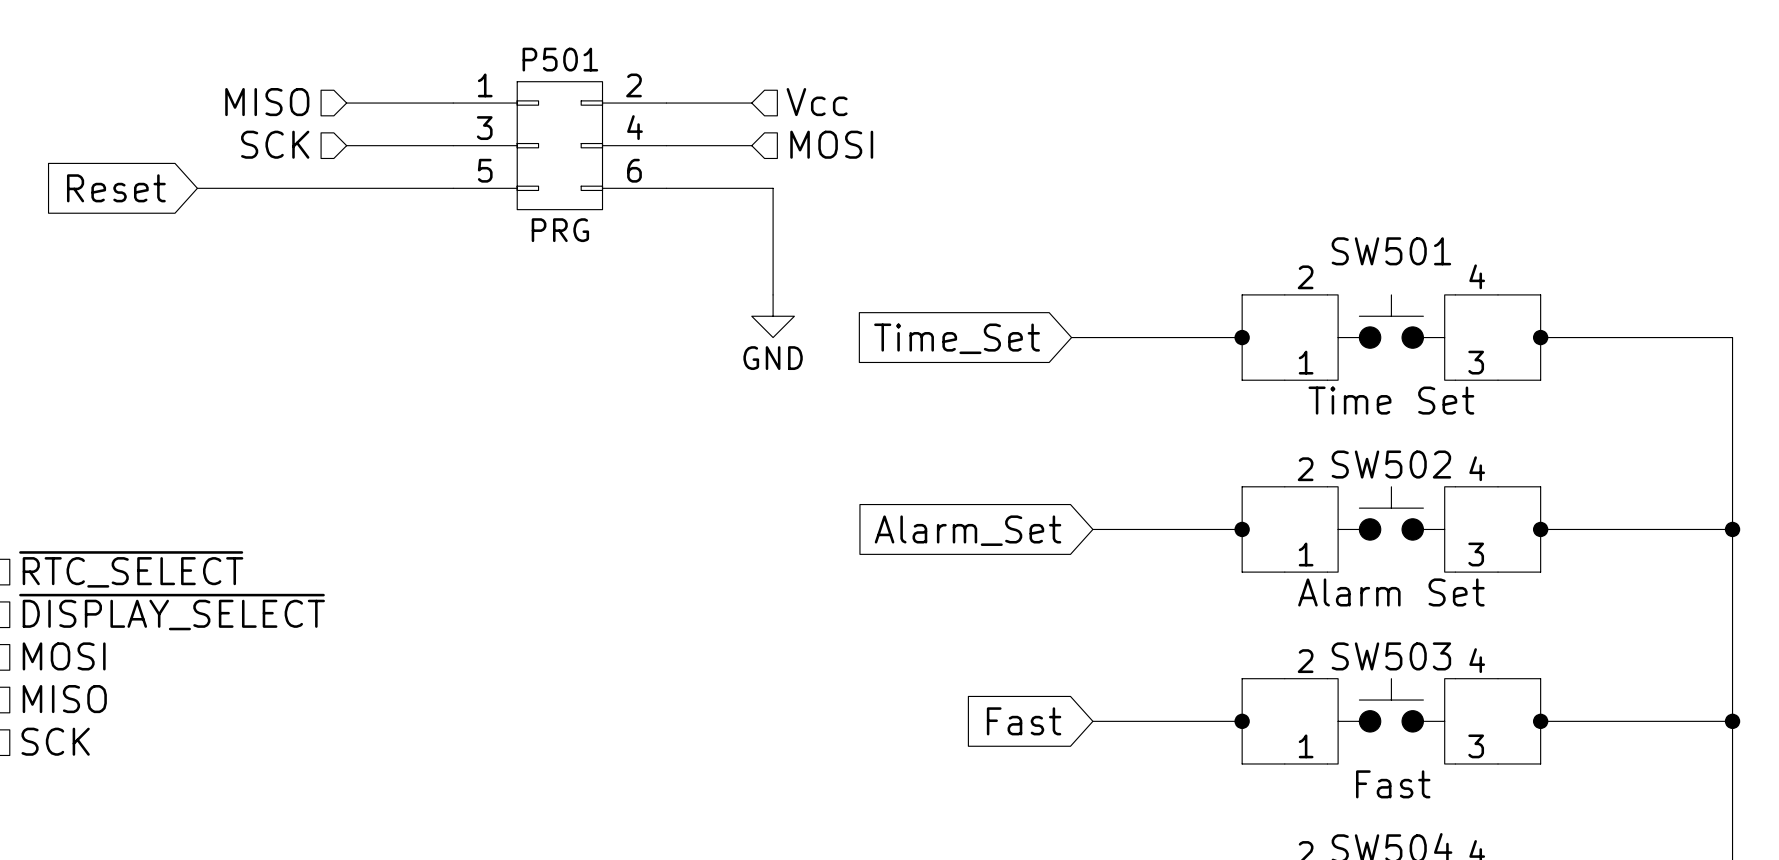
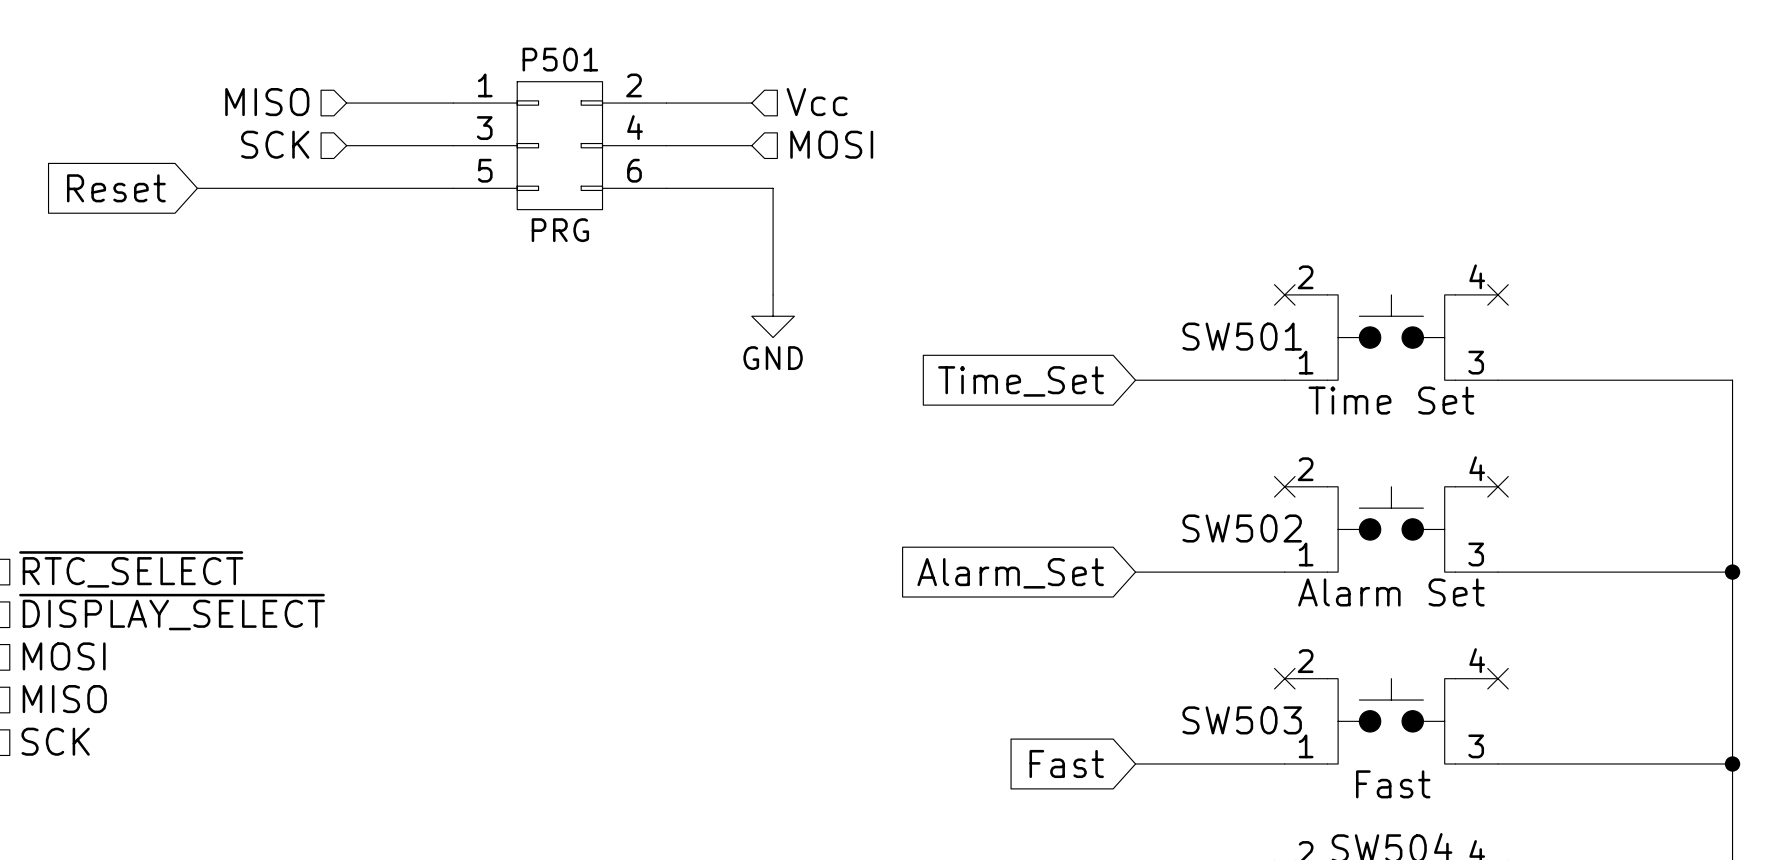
SW501 name position: SW501 (1391, 251) -> SW501 (1242, 336)
wire: (1284, 294) (1242, 294) (1242, 380) -> (1135, 380) (1242, 380)
no-connect mark: none -> (1284, 294)
wire: (1498, 294) (1540, 294) (1540, 380) -> none
no-connect mark: none -> (1498, 294)
wire: (1071, 337) (1242, 337) -> none
junction: (1242, 337) -> none
wire: (1540, 337) (1732, 337) (1732, 380) -> (1540, 380) (1732, 380)
junction: (1540, 337) -> none
global label position: Time_Set (957, 338) -> Time_Set (1021, 381)
SW502 name position: SW502 (1391, 464) -> SW502 (1242, 528)
wire: (1284, 486) (1242, 486) (1242, 572) -> (1135, 572) (1242, 572)
no-connect mark: none -> (1284, 486)
wire: (1498, 486) (1540, 486) (1540, 572) -> (1732, 572) (1540, 572)
no-connect mark: none -> (1498, 486)
wire: (1092, 529) (1242, 529) -> none
junction: (1242, 529) -> none
wire: (1540, 529) (1732, 529) -> none
junction: (1540, 529) -> none
junction position: (1732, 529) -> (1732, 572)
global label position: Alarm_Set (968, 530) -> Alarm_Set (1010, 573)
SW503 name position: SW503 (1391, 656) -> SW503 (1242, 720)
wire: (1284, 678) (1242, 678) (1242, 763) -> (1135, 763) (1242, 763)
no-connect mark: none -> (1284, 678)
wire: (1498, 678) (1540, 678) (1540, 763) -> (1732, 763) (1540, 763)
no-connect mark: none -> (1498, 678)
global label position: Fast (1024, 721) -> Fast (1066, 763)
wire: (1092, 721) (1242, 721) -> none
junction: (1242, 721) -> none
wire: (1540, 721) (1732, 721) -> none
junction: (1540, 721) -> none
junction position: (1732, 721) -> (1732, 763)

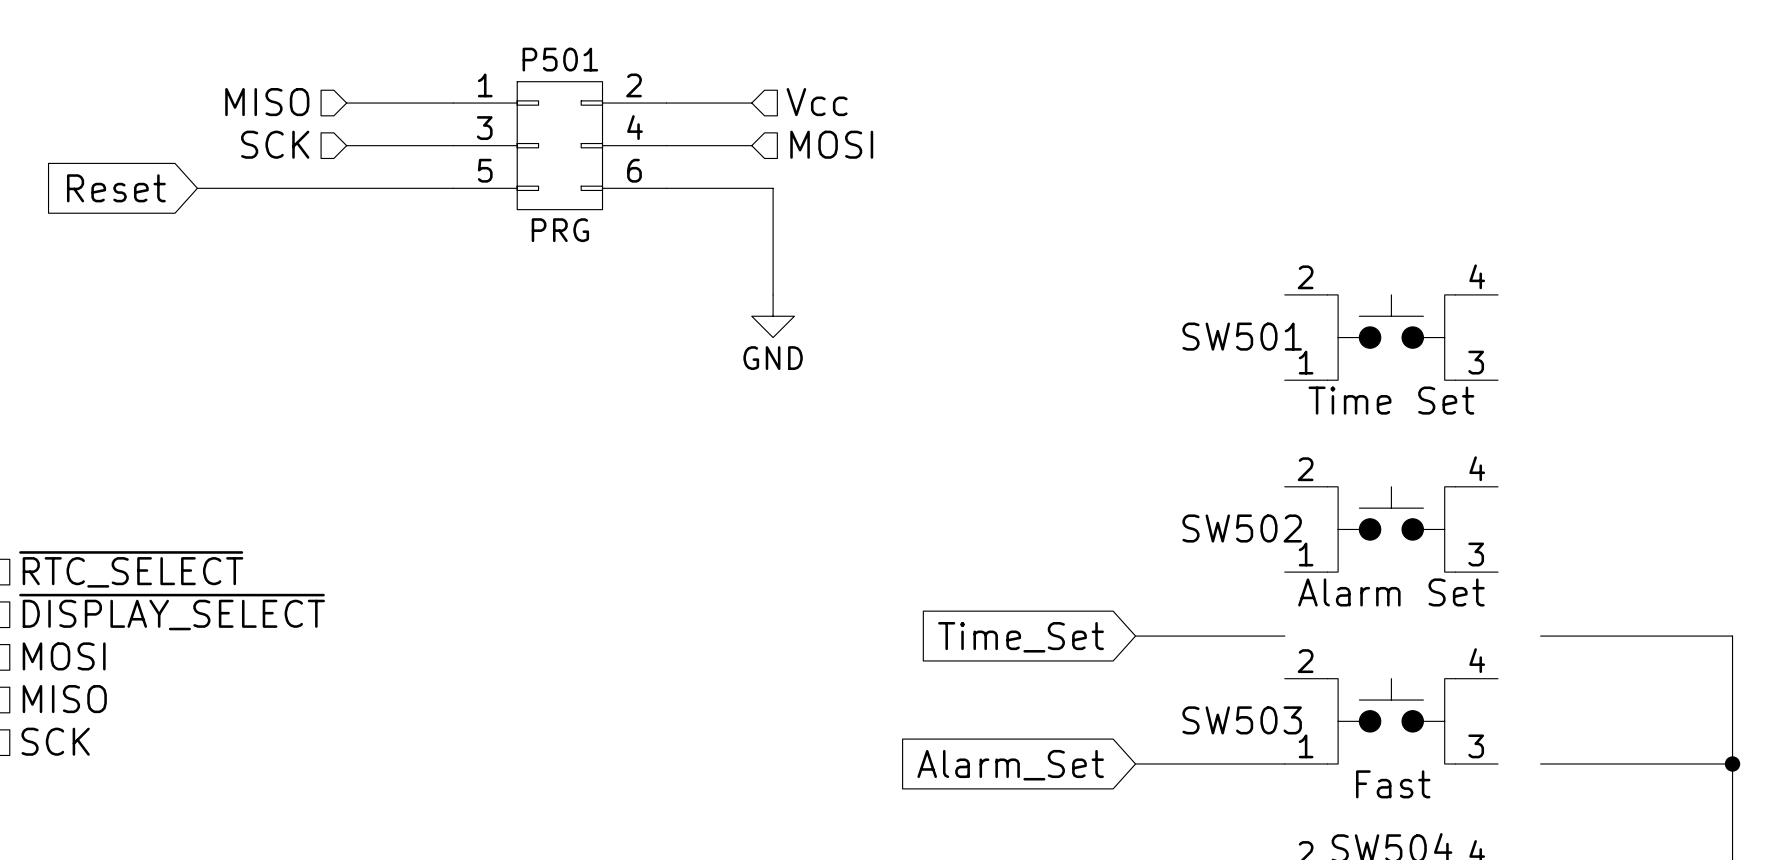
no-connect mark: (1284, 294) -> none
no-connect mark: (1498, 294) -> none
wire: (1135, 380) (1284, 380) -> none
wire: (1498, 380) (1732, 380) (1732, 636) -> (1540, 636) (1732, 636)
global label position: Time_Set (1021, 381) -> Time_Set (1021, 637)
no-connect mark: (1284, 486) -> none
no-connect mark: (1498, 486) -> none
wire: (1135, 572) (1284, 572) -> (1135, 636) (1284, 636)
wire: (1498, 572) (1732, 572) -> none
junction: (1732, 572) -> none
global label: Alarm_Set (1010, 573) -> none
no-connect mark: (1284, 678) -> none
no-connect mark: (1498, 678) -> none
global label: Fast (1066, 763) -> Alarm_Set (1010, 765)
wire: (1498, 763) (1540, 763) -> none

